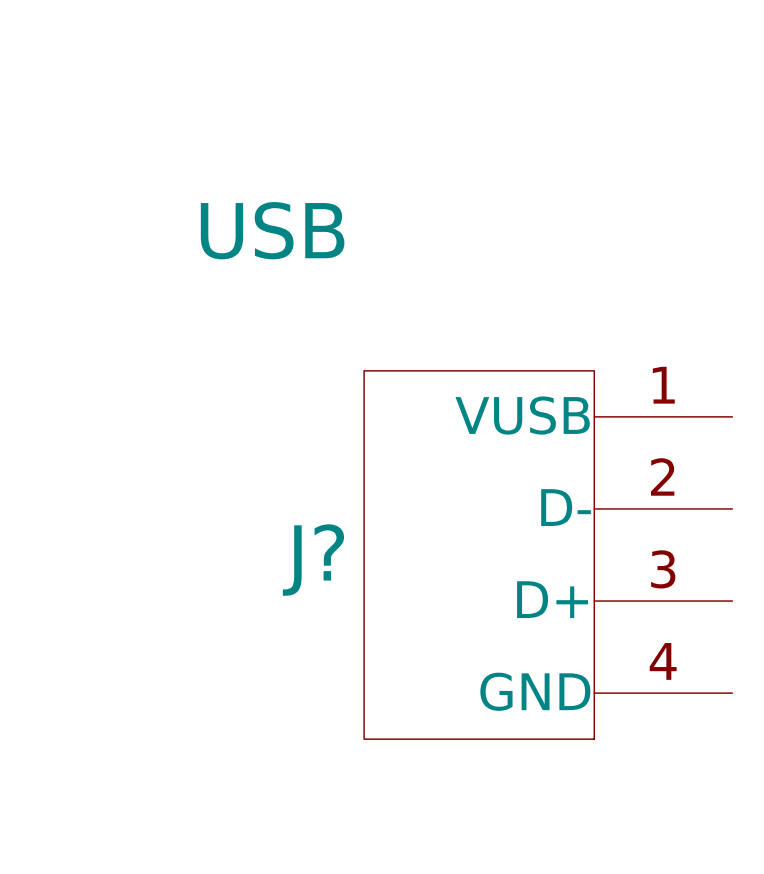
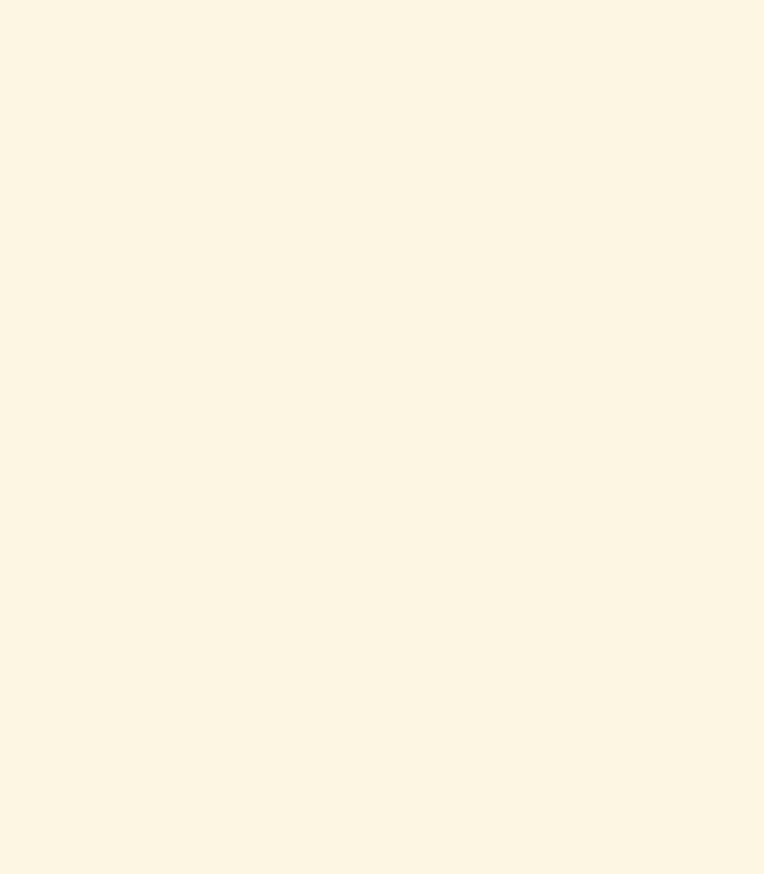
J?: USB (548, 555) -> none

